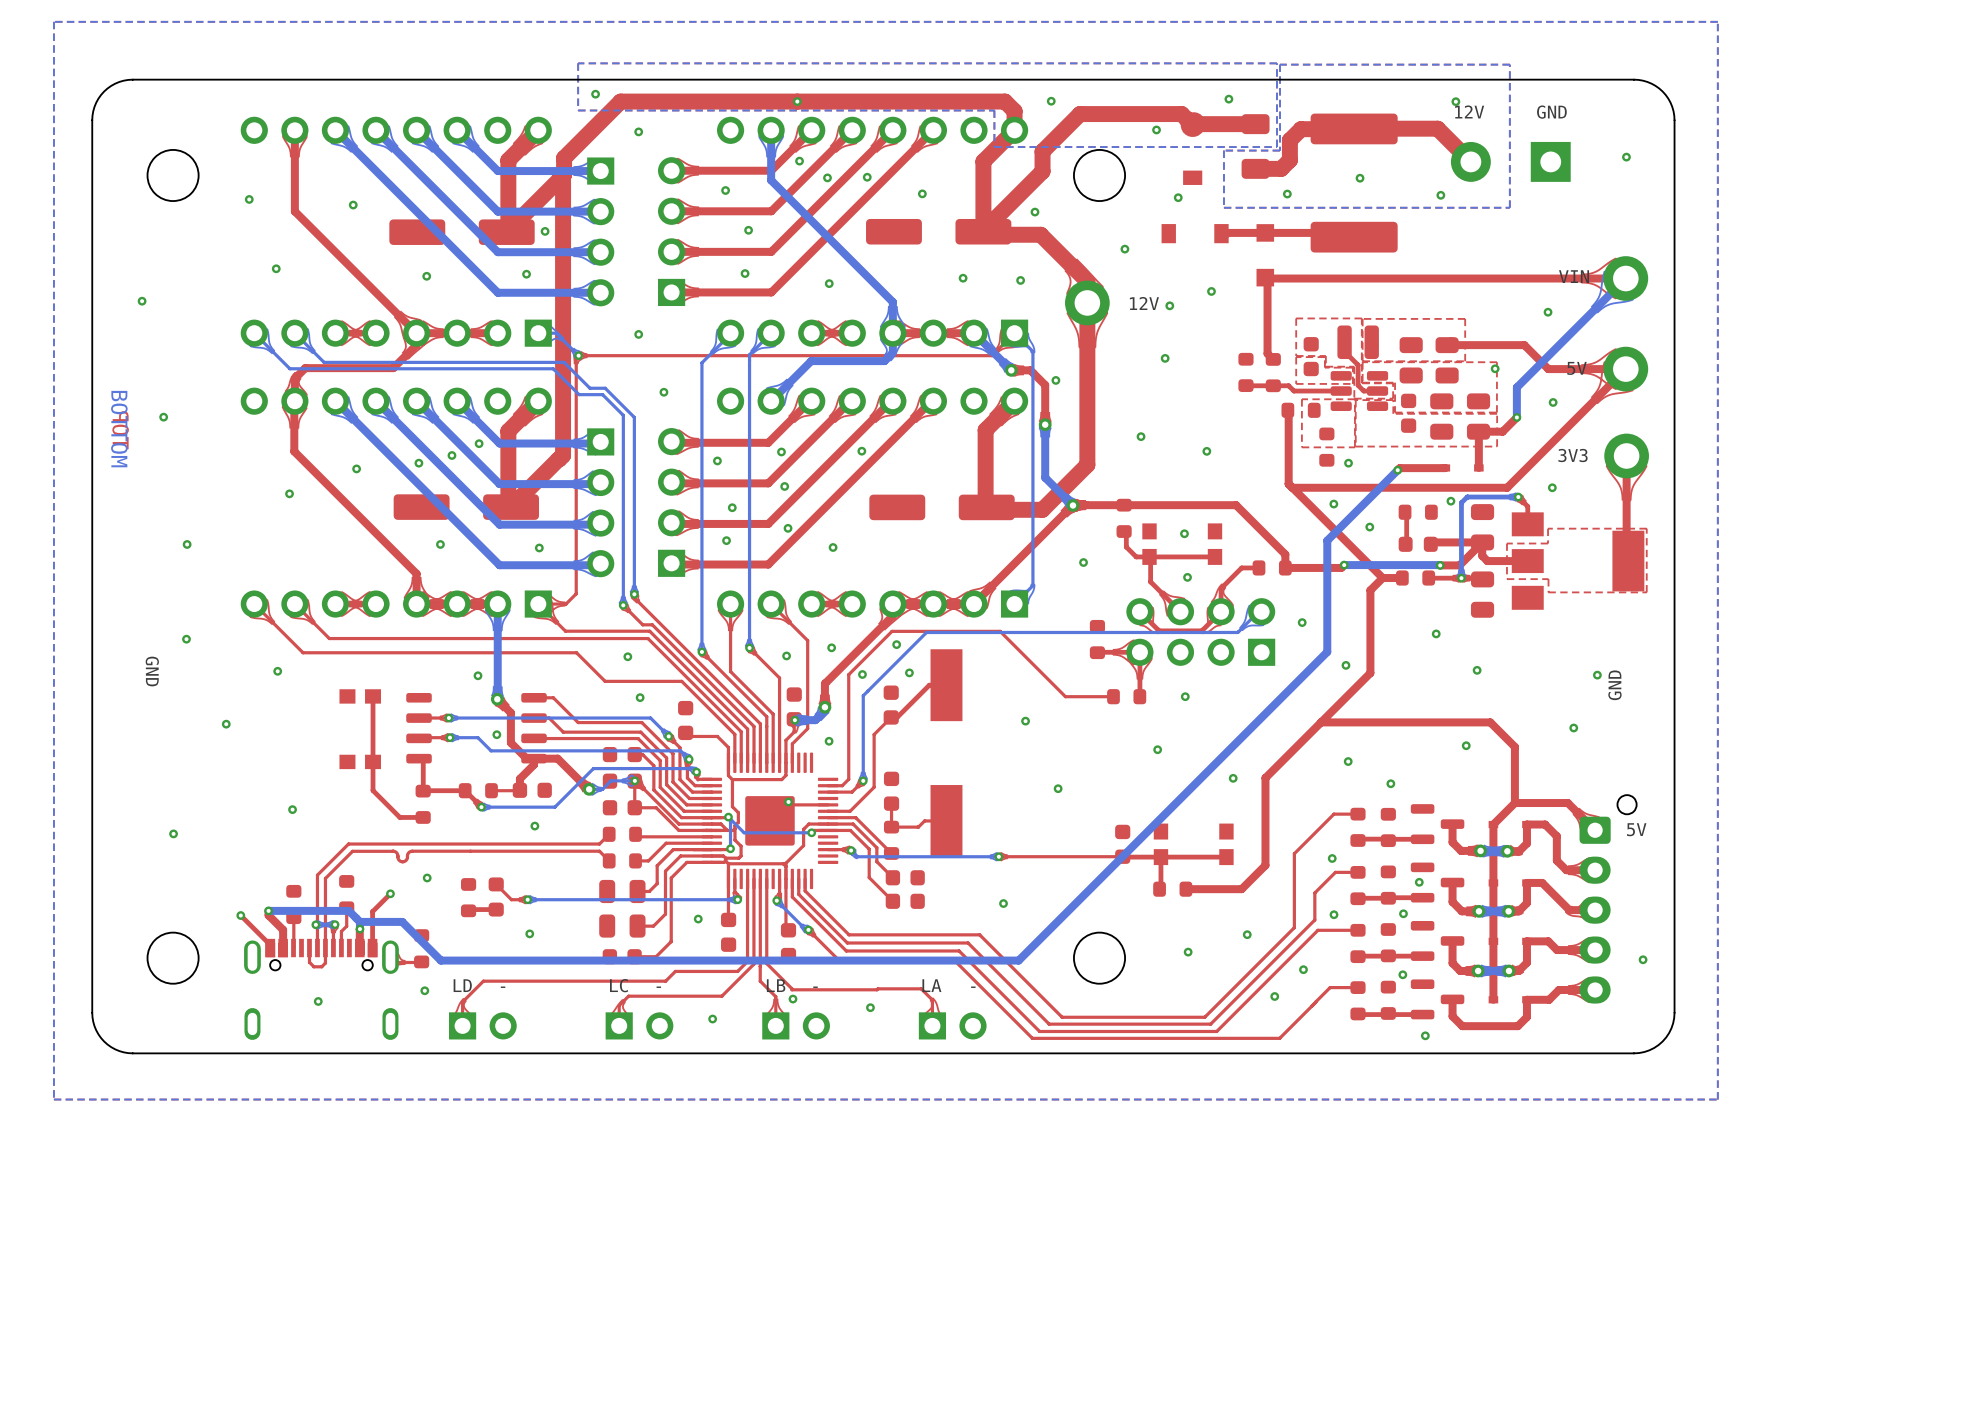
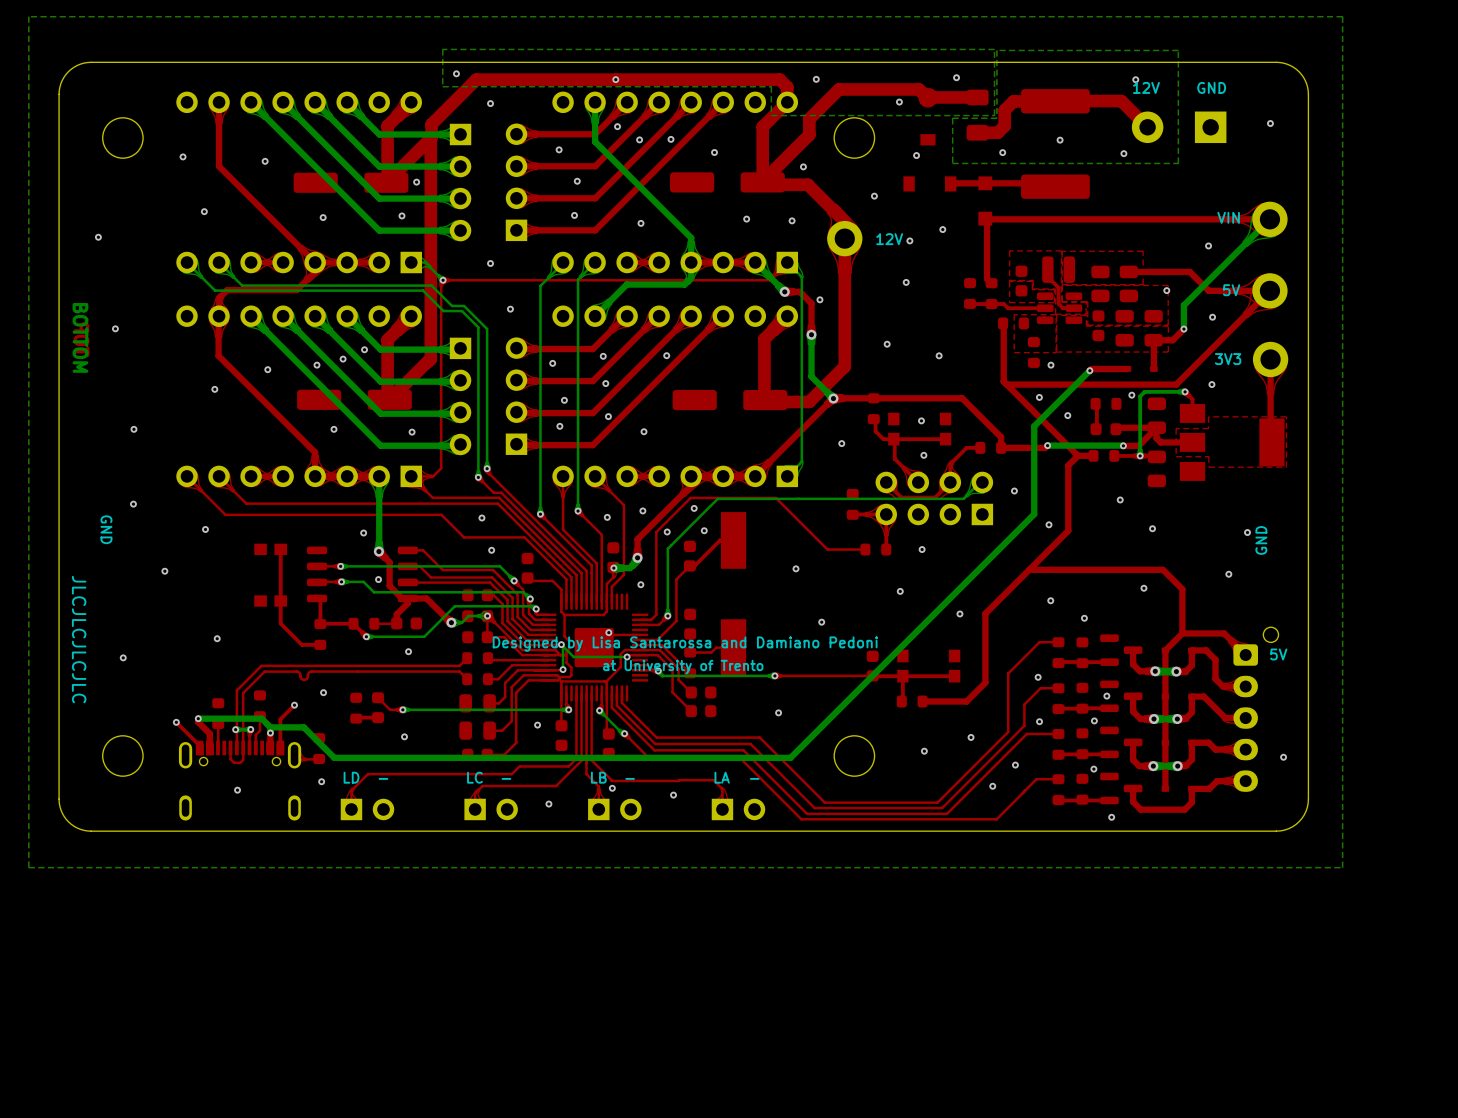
text: none -> JLCJLCJLCJLC (79, 639)
text: none -> Designed by Lisa Santarossa and Damiano Pedoni (685, 644)
text: none -> at University of Trento (683, 667)

